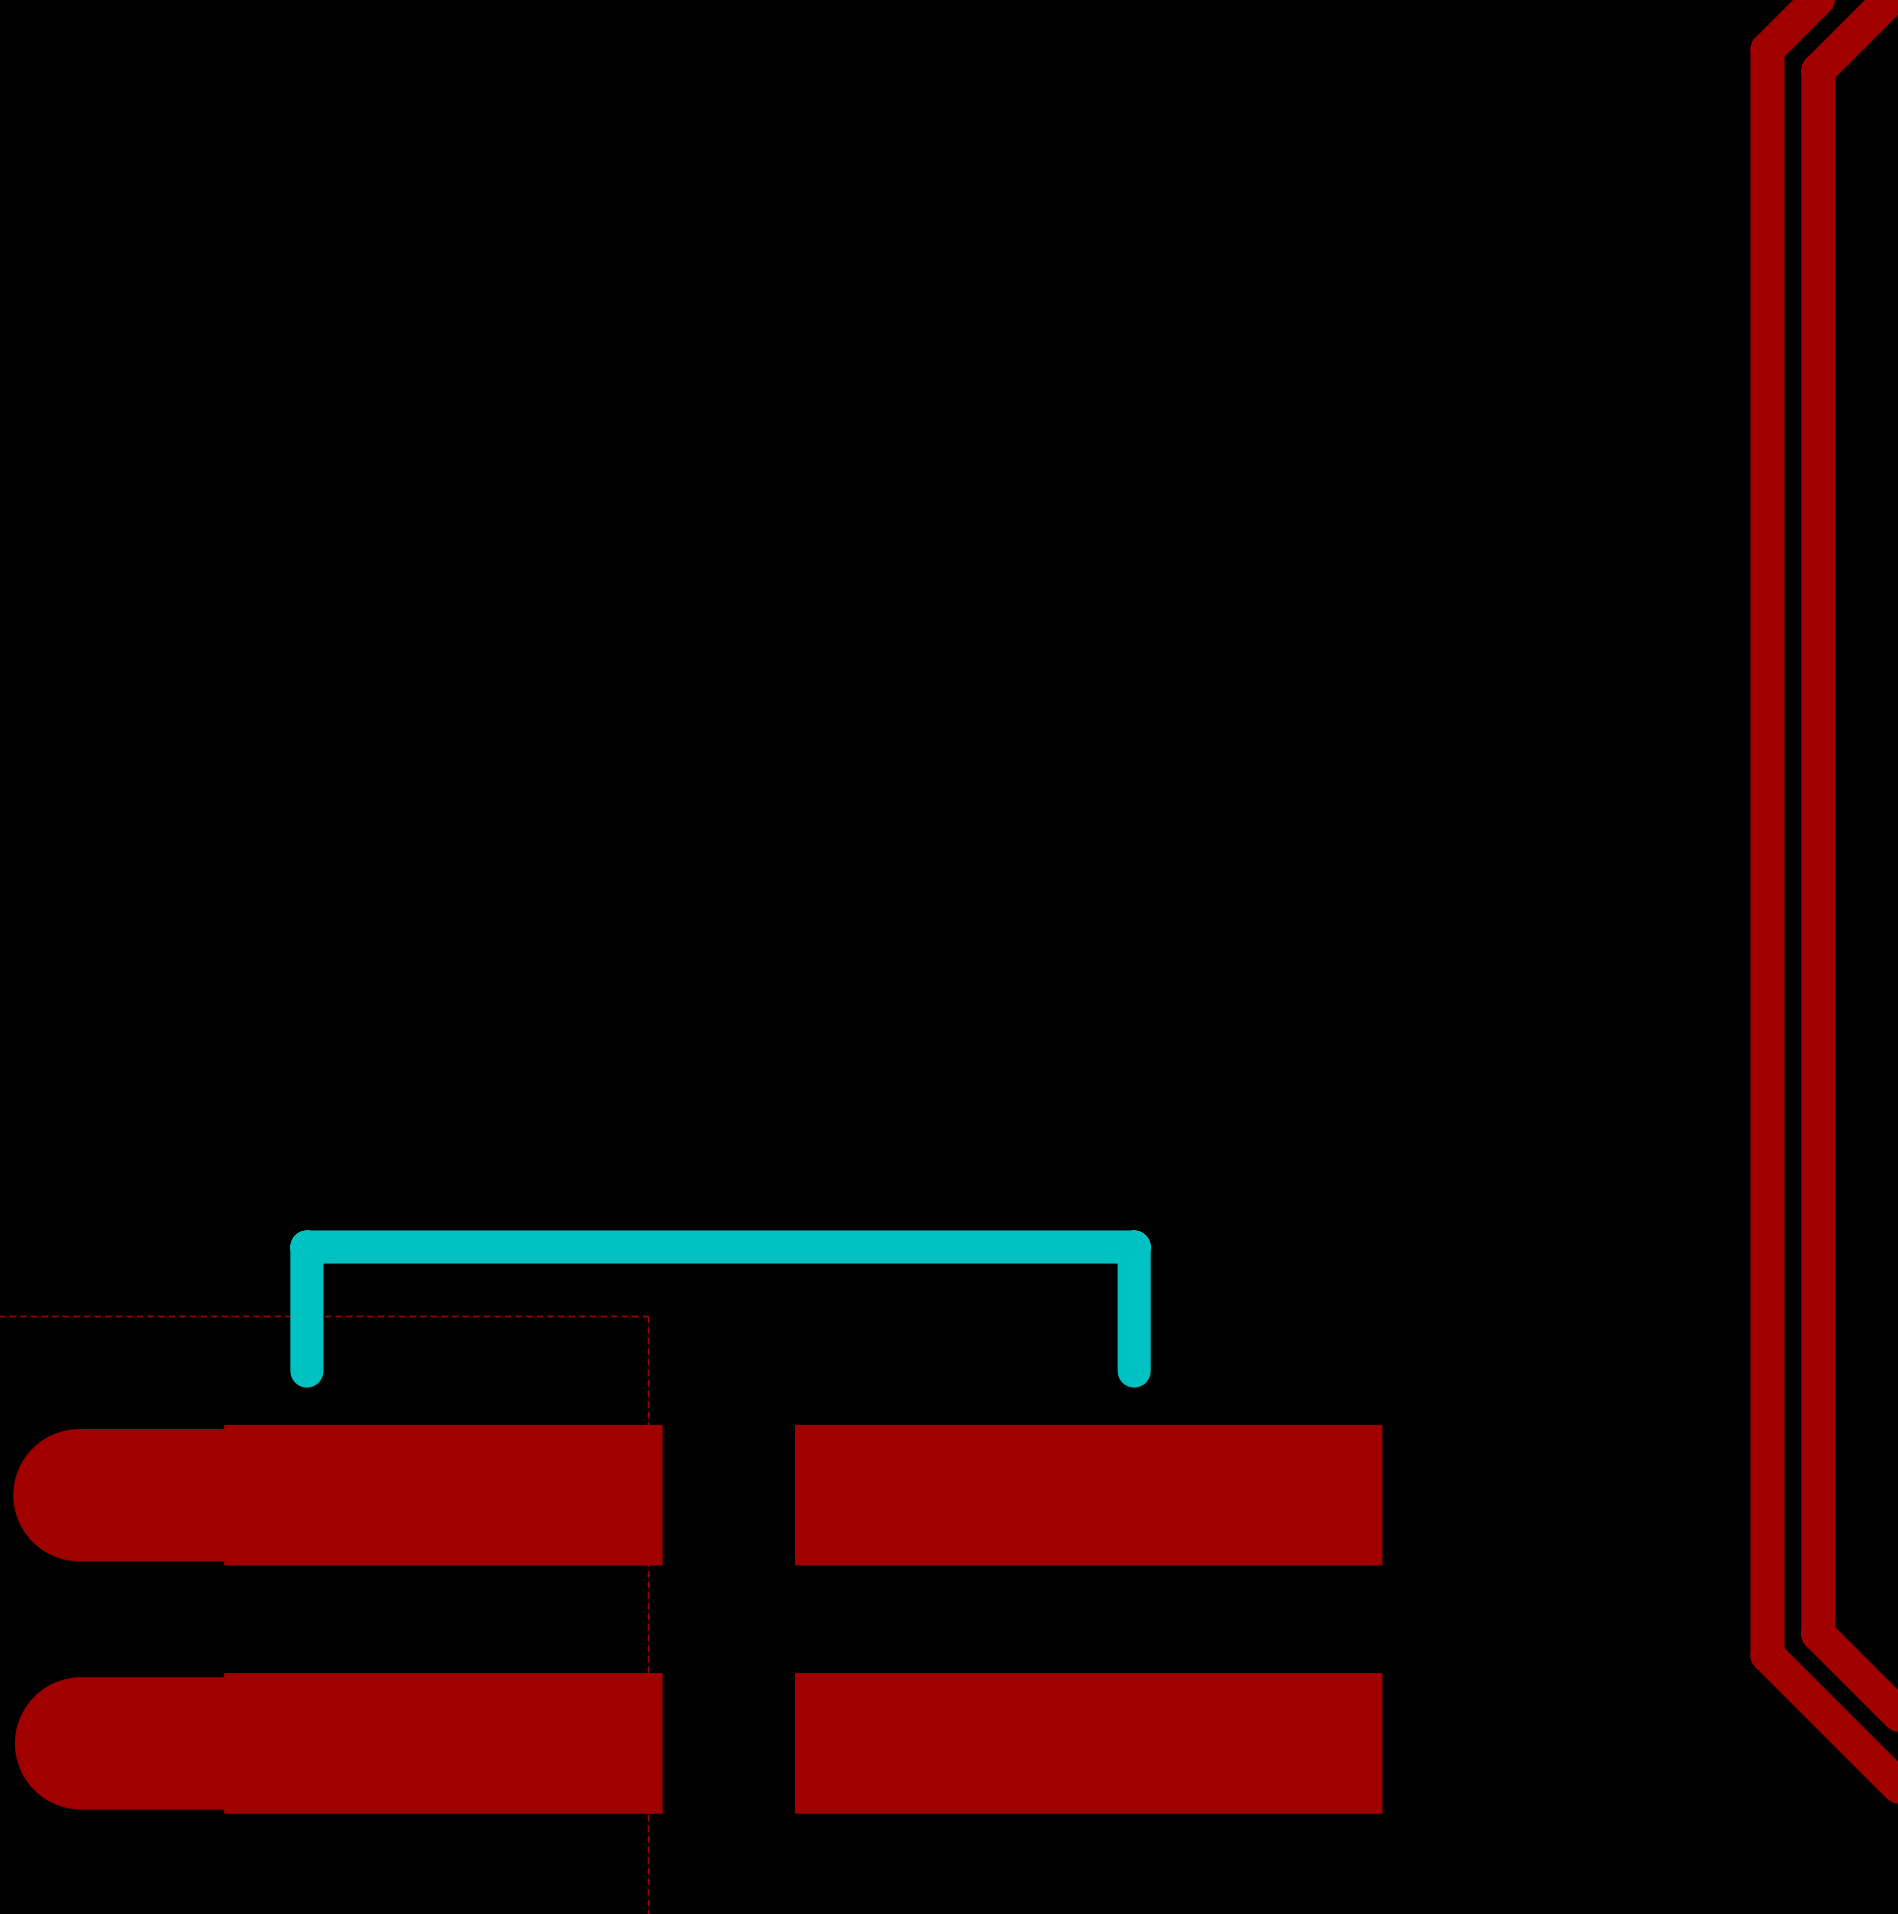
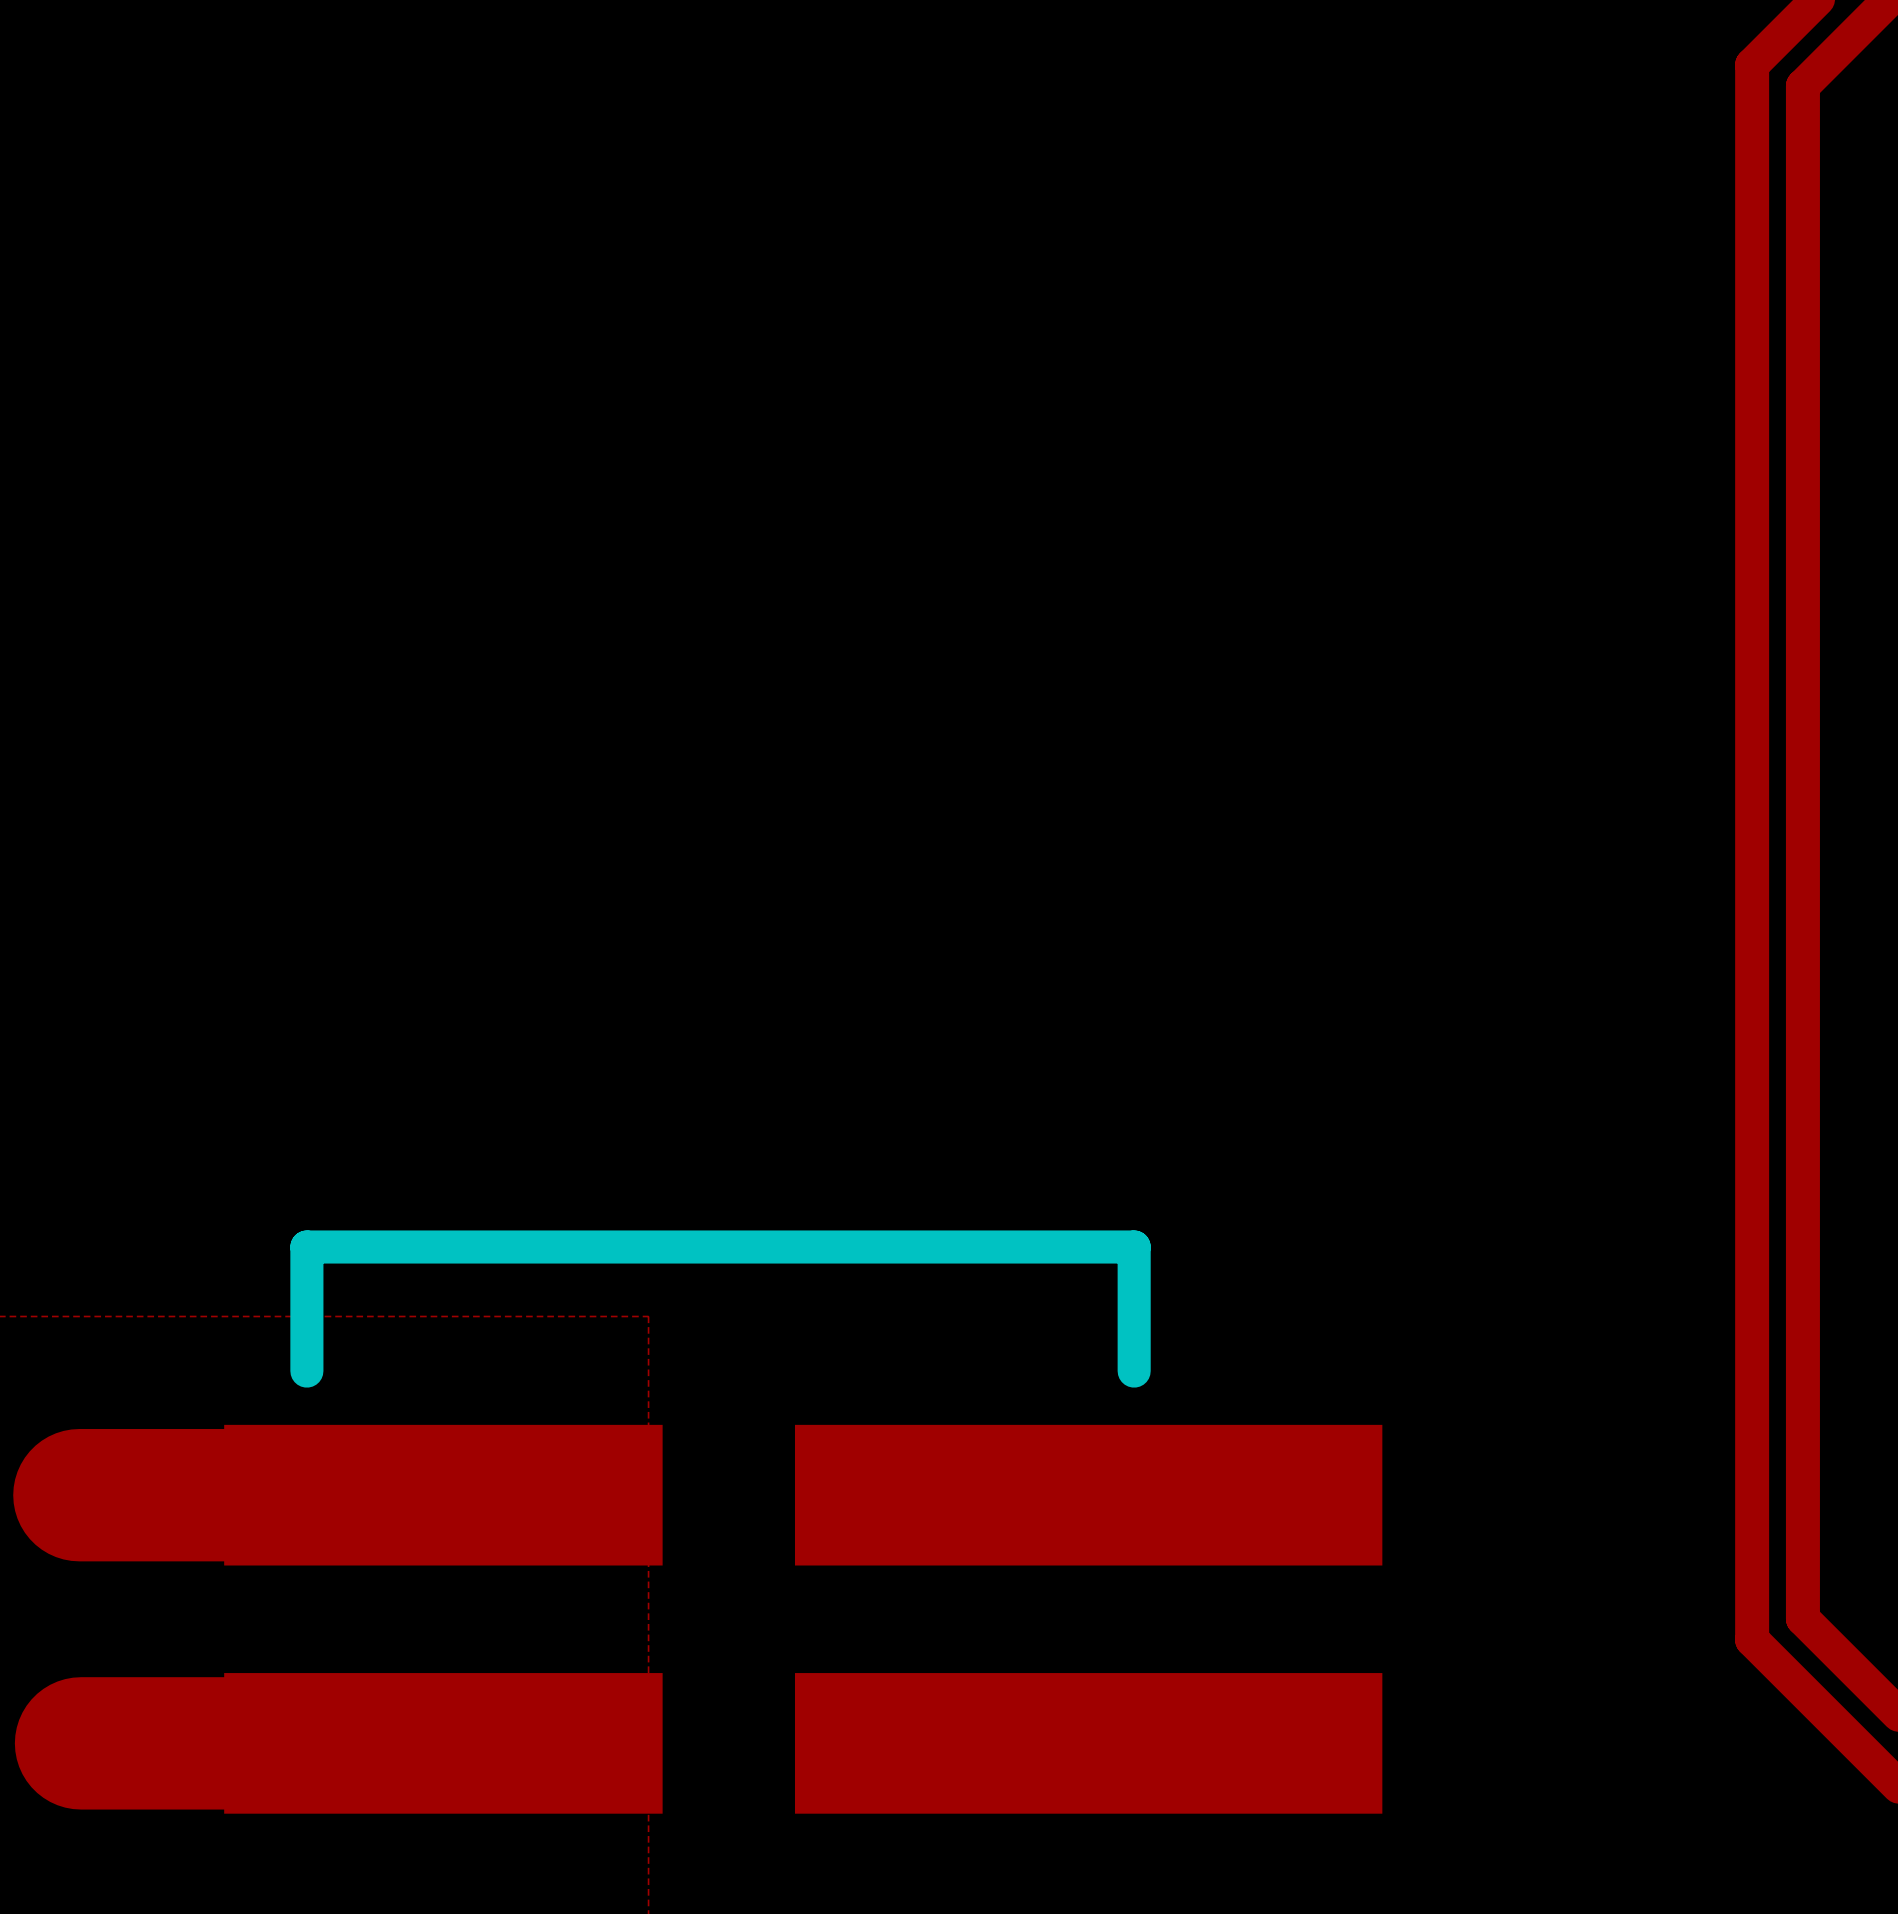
top track: (1767, 49) (1767, 1655) -> (1767, 49) (1752, 64) (1752, 1639) (1767, 1655)
top track: (1818, 70) (1818, 1634) -> (1818, 70) (1802, 86) (1802, 1618) (1818, 1634)

